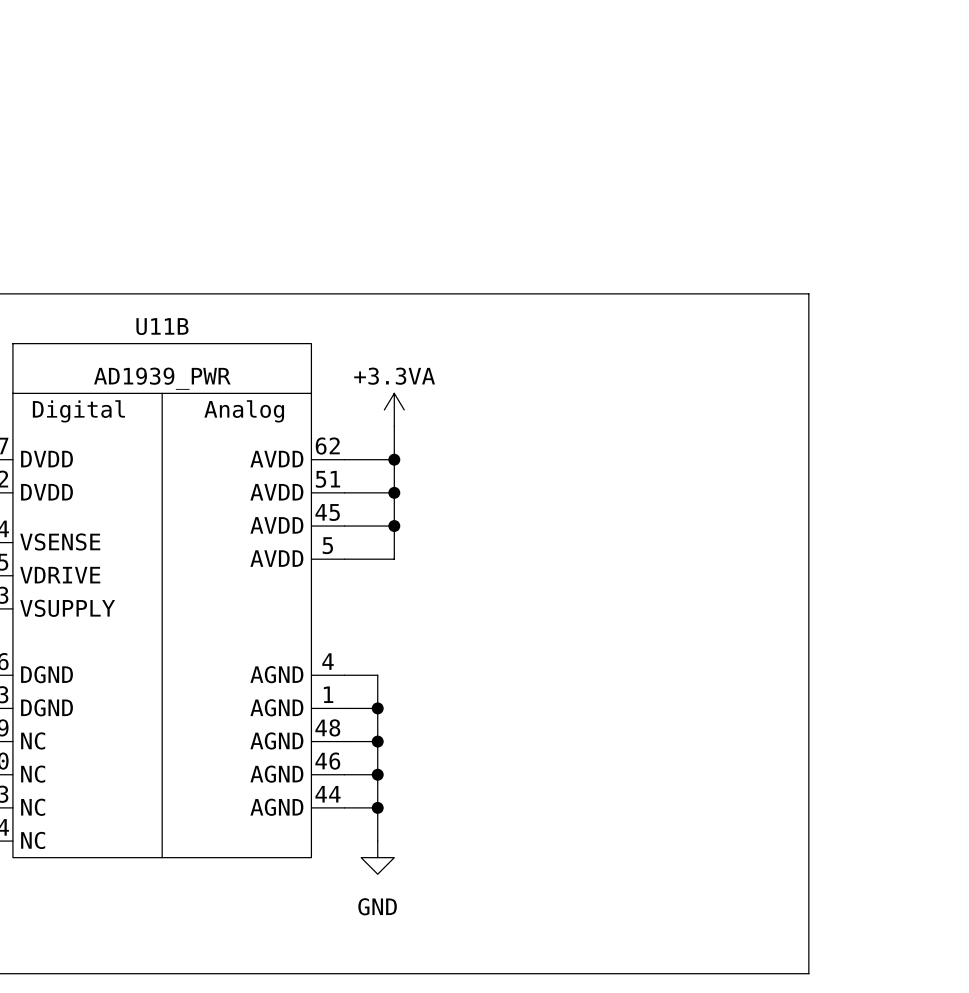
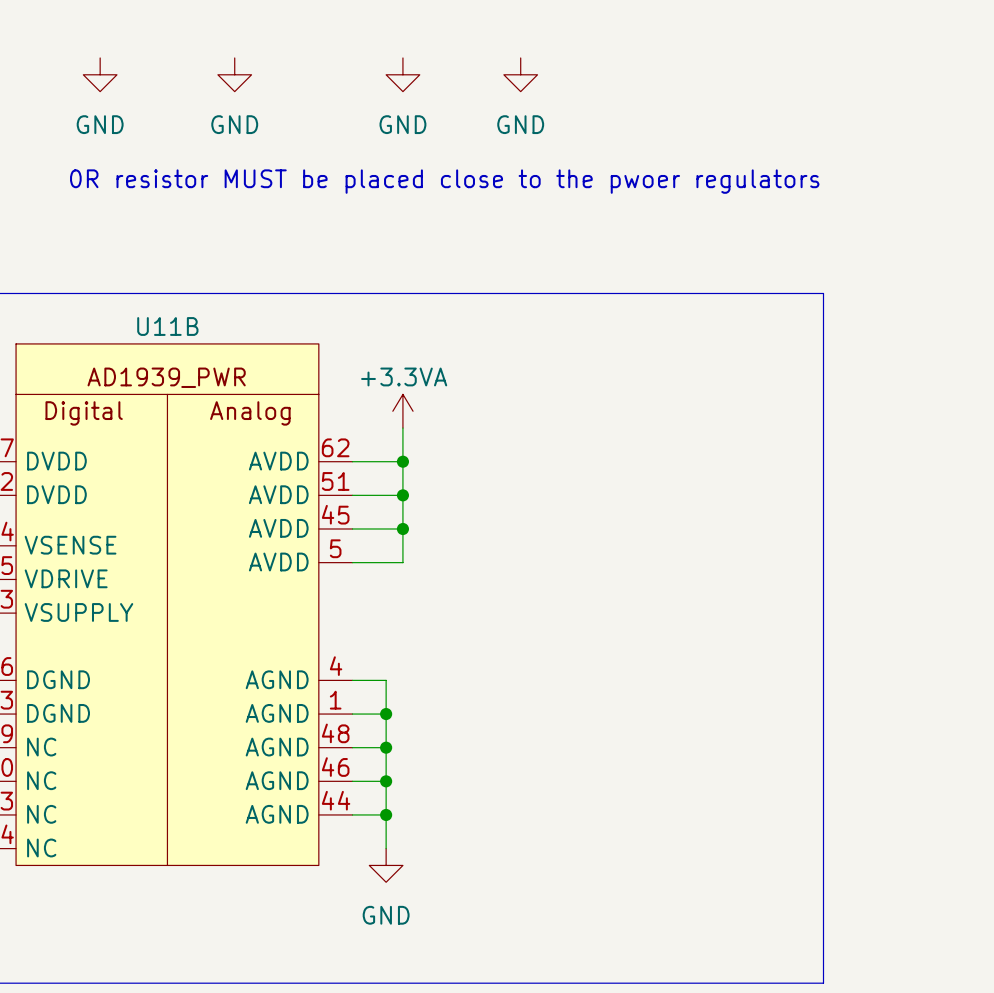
power symbol: none -> GND (100, 74)
power symbol: none -> GND (234, 74)
power symbol: none -> GND (402, 74)
power symbol: none -> GND (520, 74)
text: none -> 0R resistor MUST be placed close to the pwoer regulators (444, 181)

